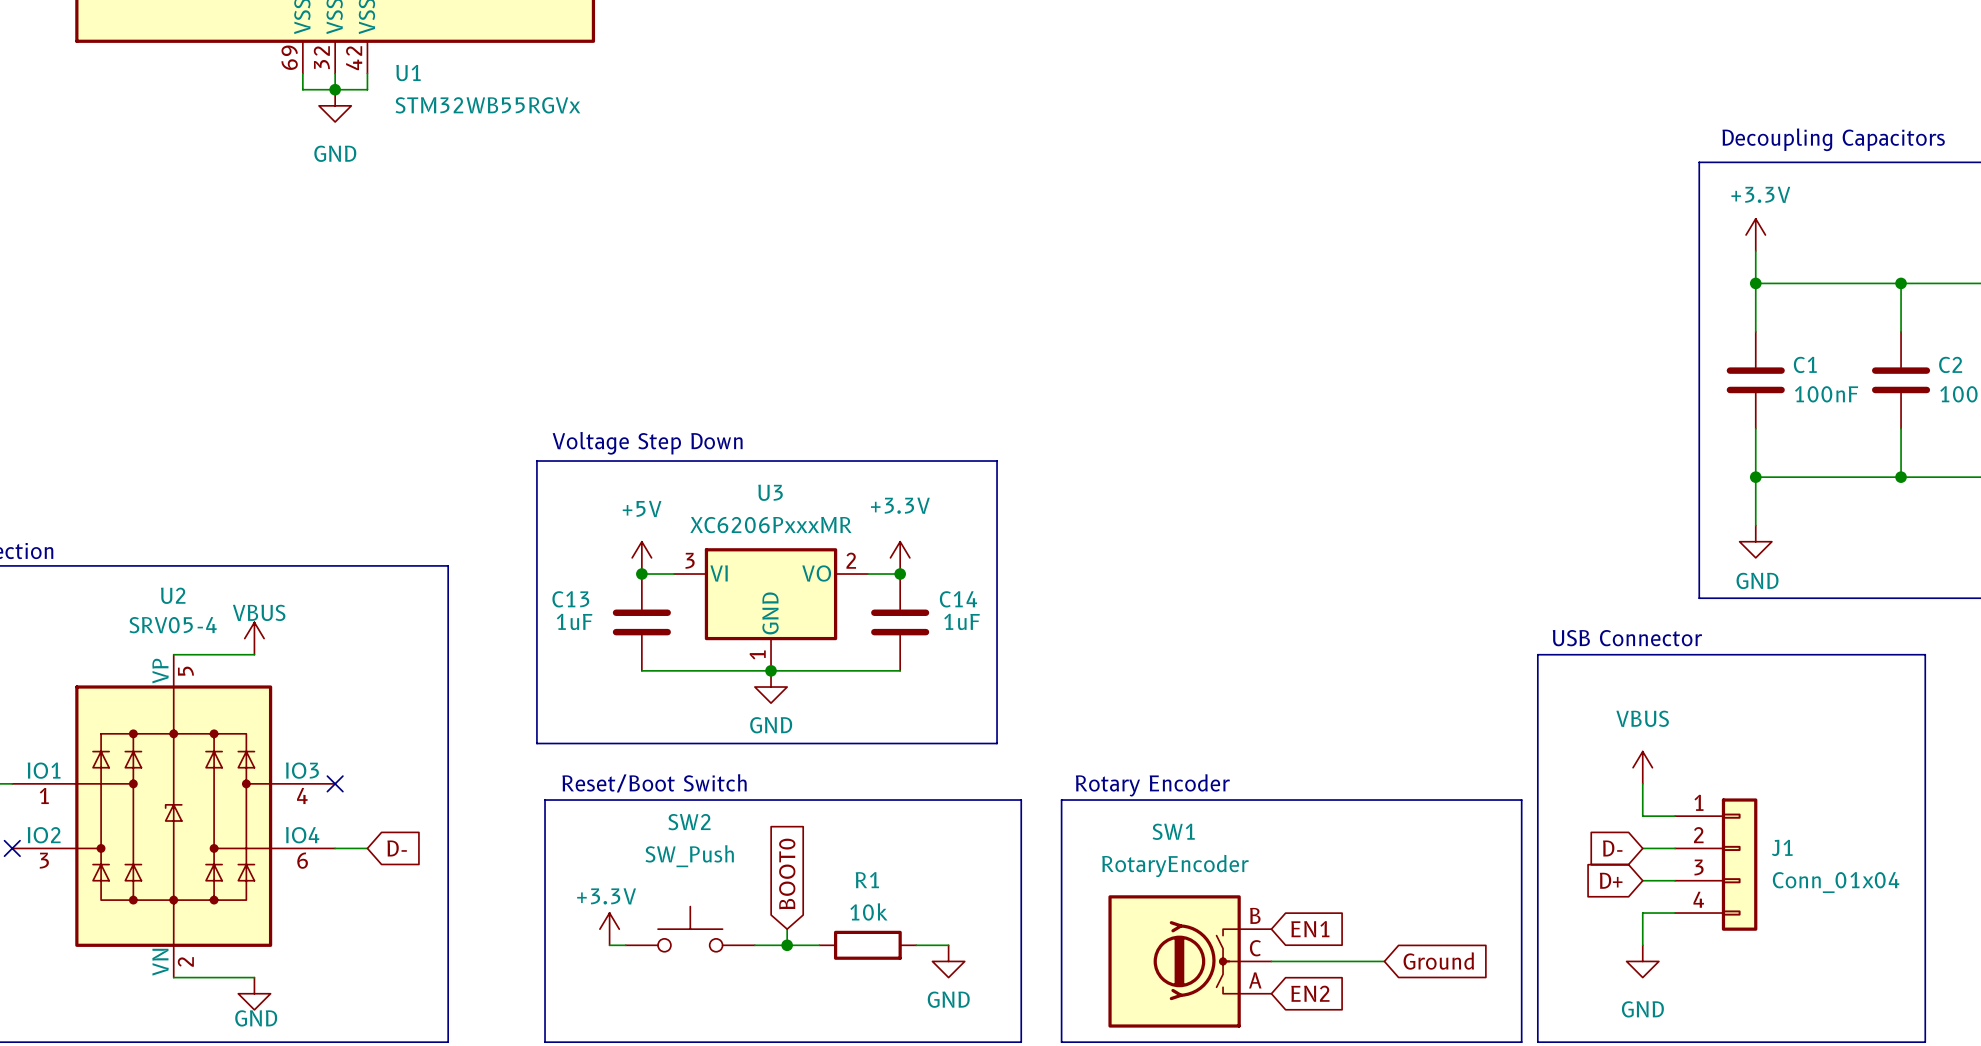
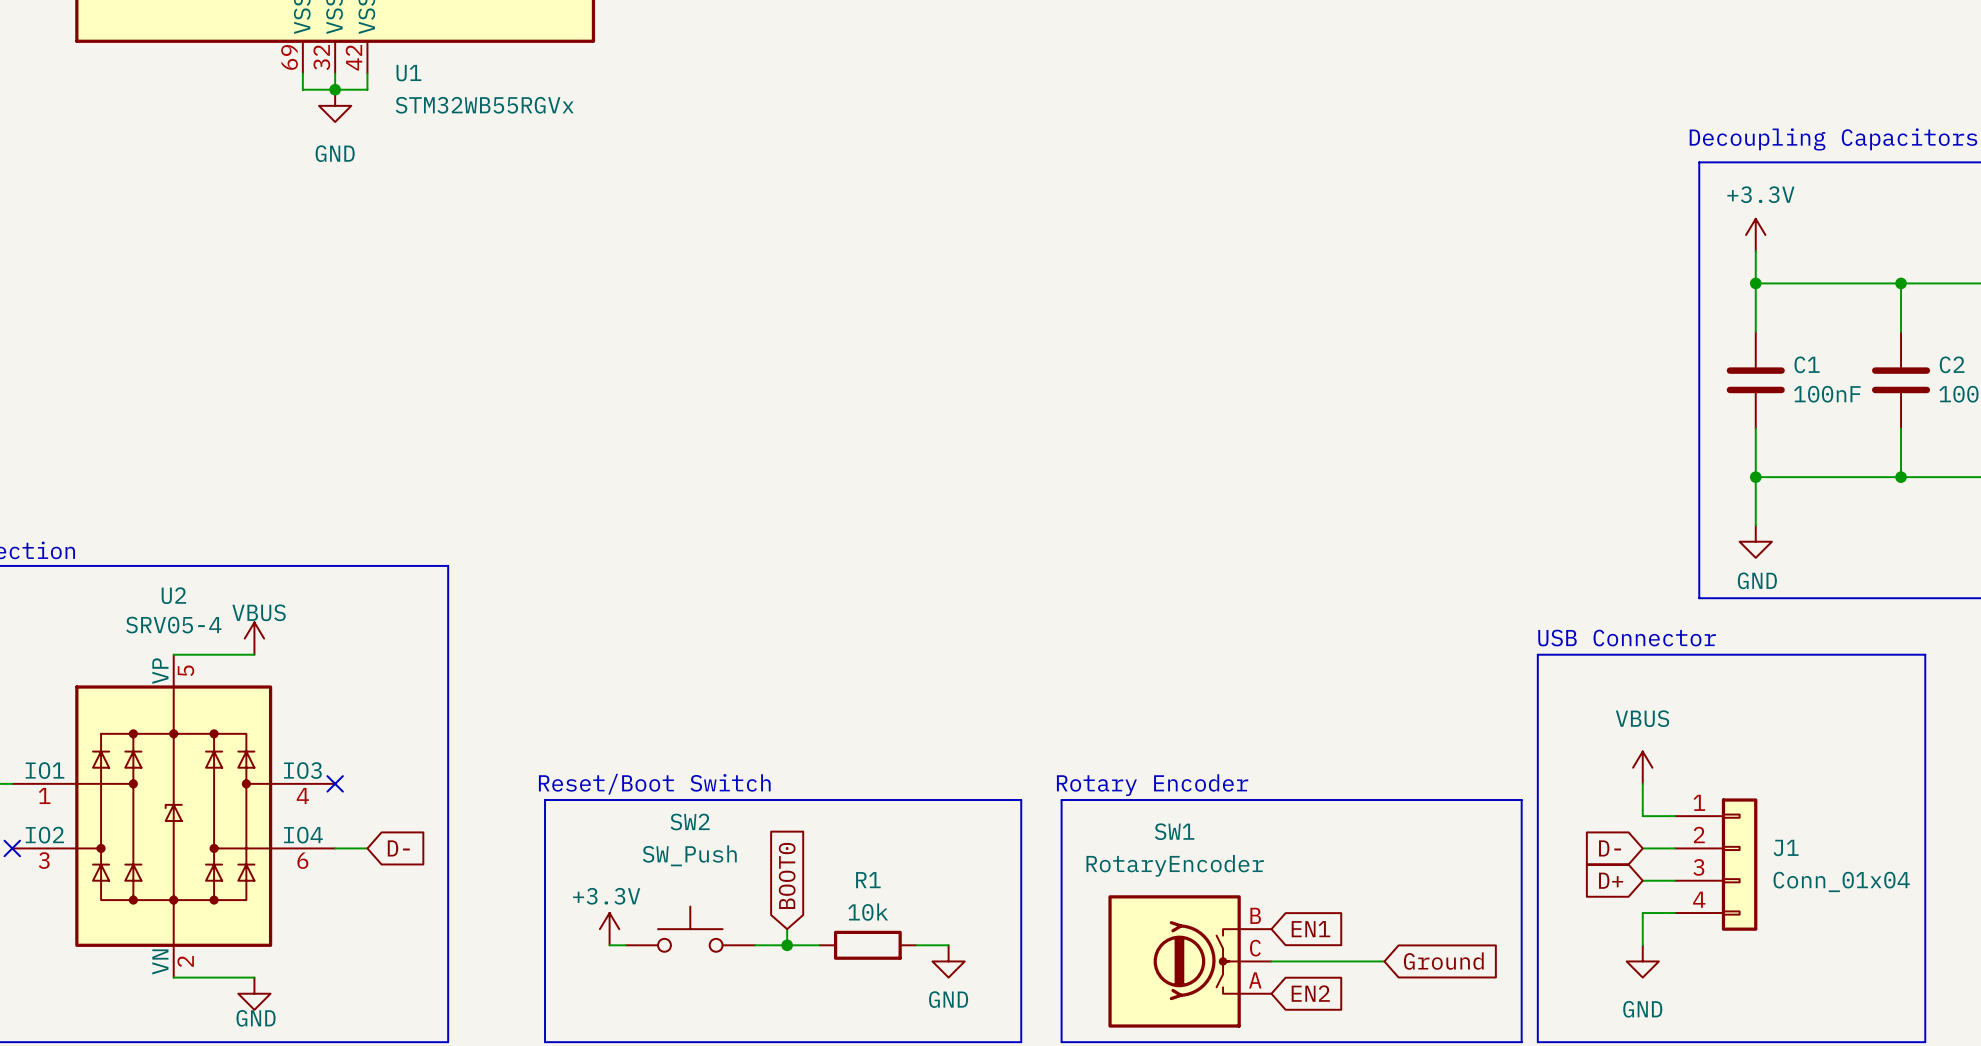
text: Voltage Step Down (647, 443) -> none
line: (536, 461) (997, 461) (997, 743) (536, 743) (536, 461) -> none
power symbol: +5V (641, 557) -> none
power symbol: +3.3V (900, 557) -> none
wire: (641, 574) (674, 574) -> none
junction: (641, 574) -> none
wire: (867, 574) (900, 574) -> none
junction: (900, 574) -> none
U3: XC6206PxxxMR (771, 609) -> none
C13: 1uF (641, 622) -> none
C14: 1uF (900, 622) -> none
wire: (641, 670) (900, 670) -> none
junction: (771, 670) -> none
power symbol: GND (771, 687) -> none

